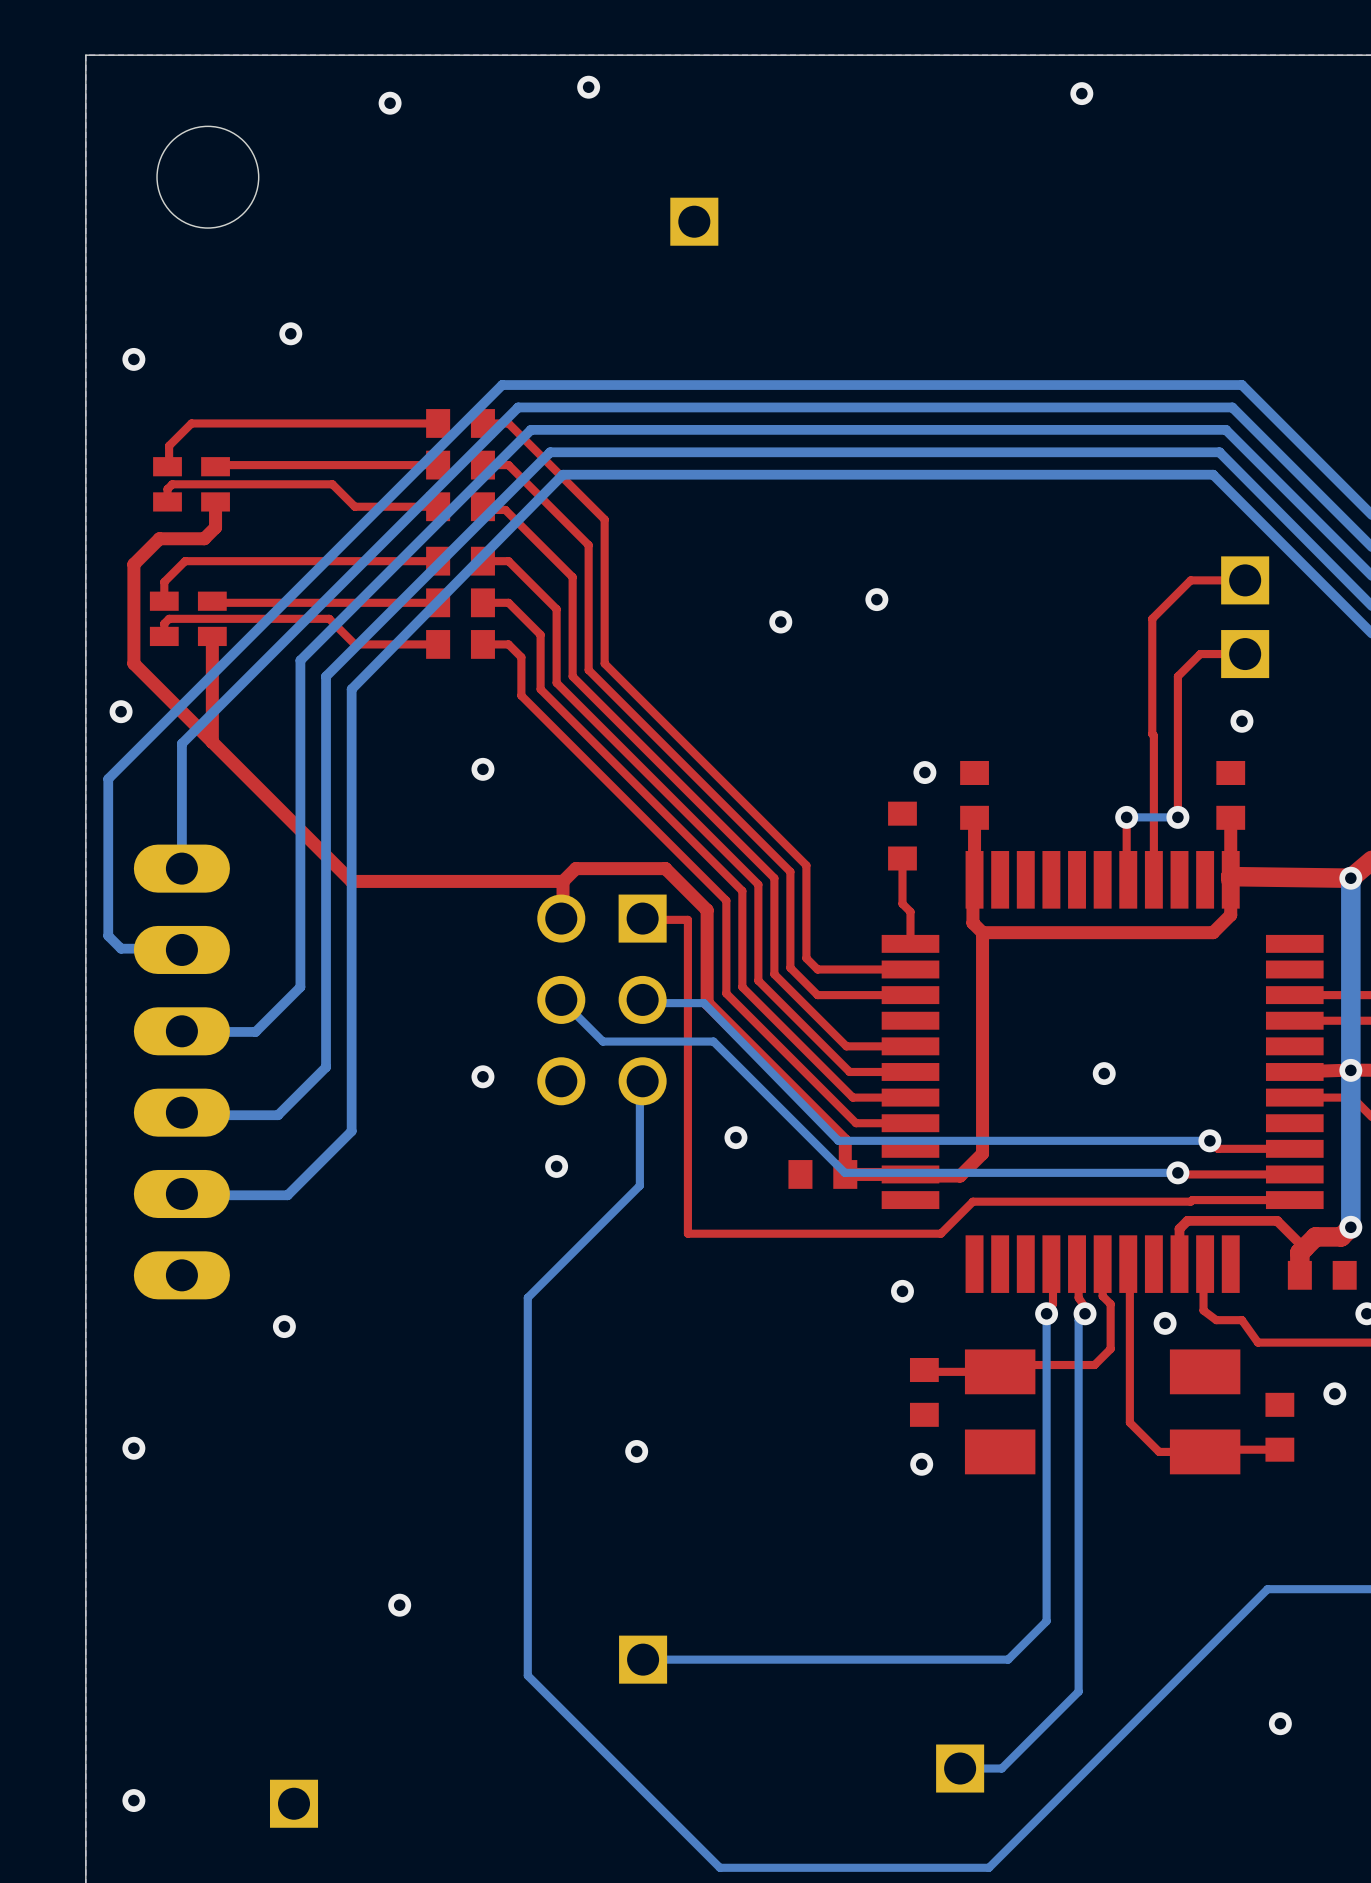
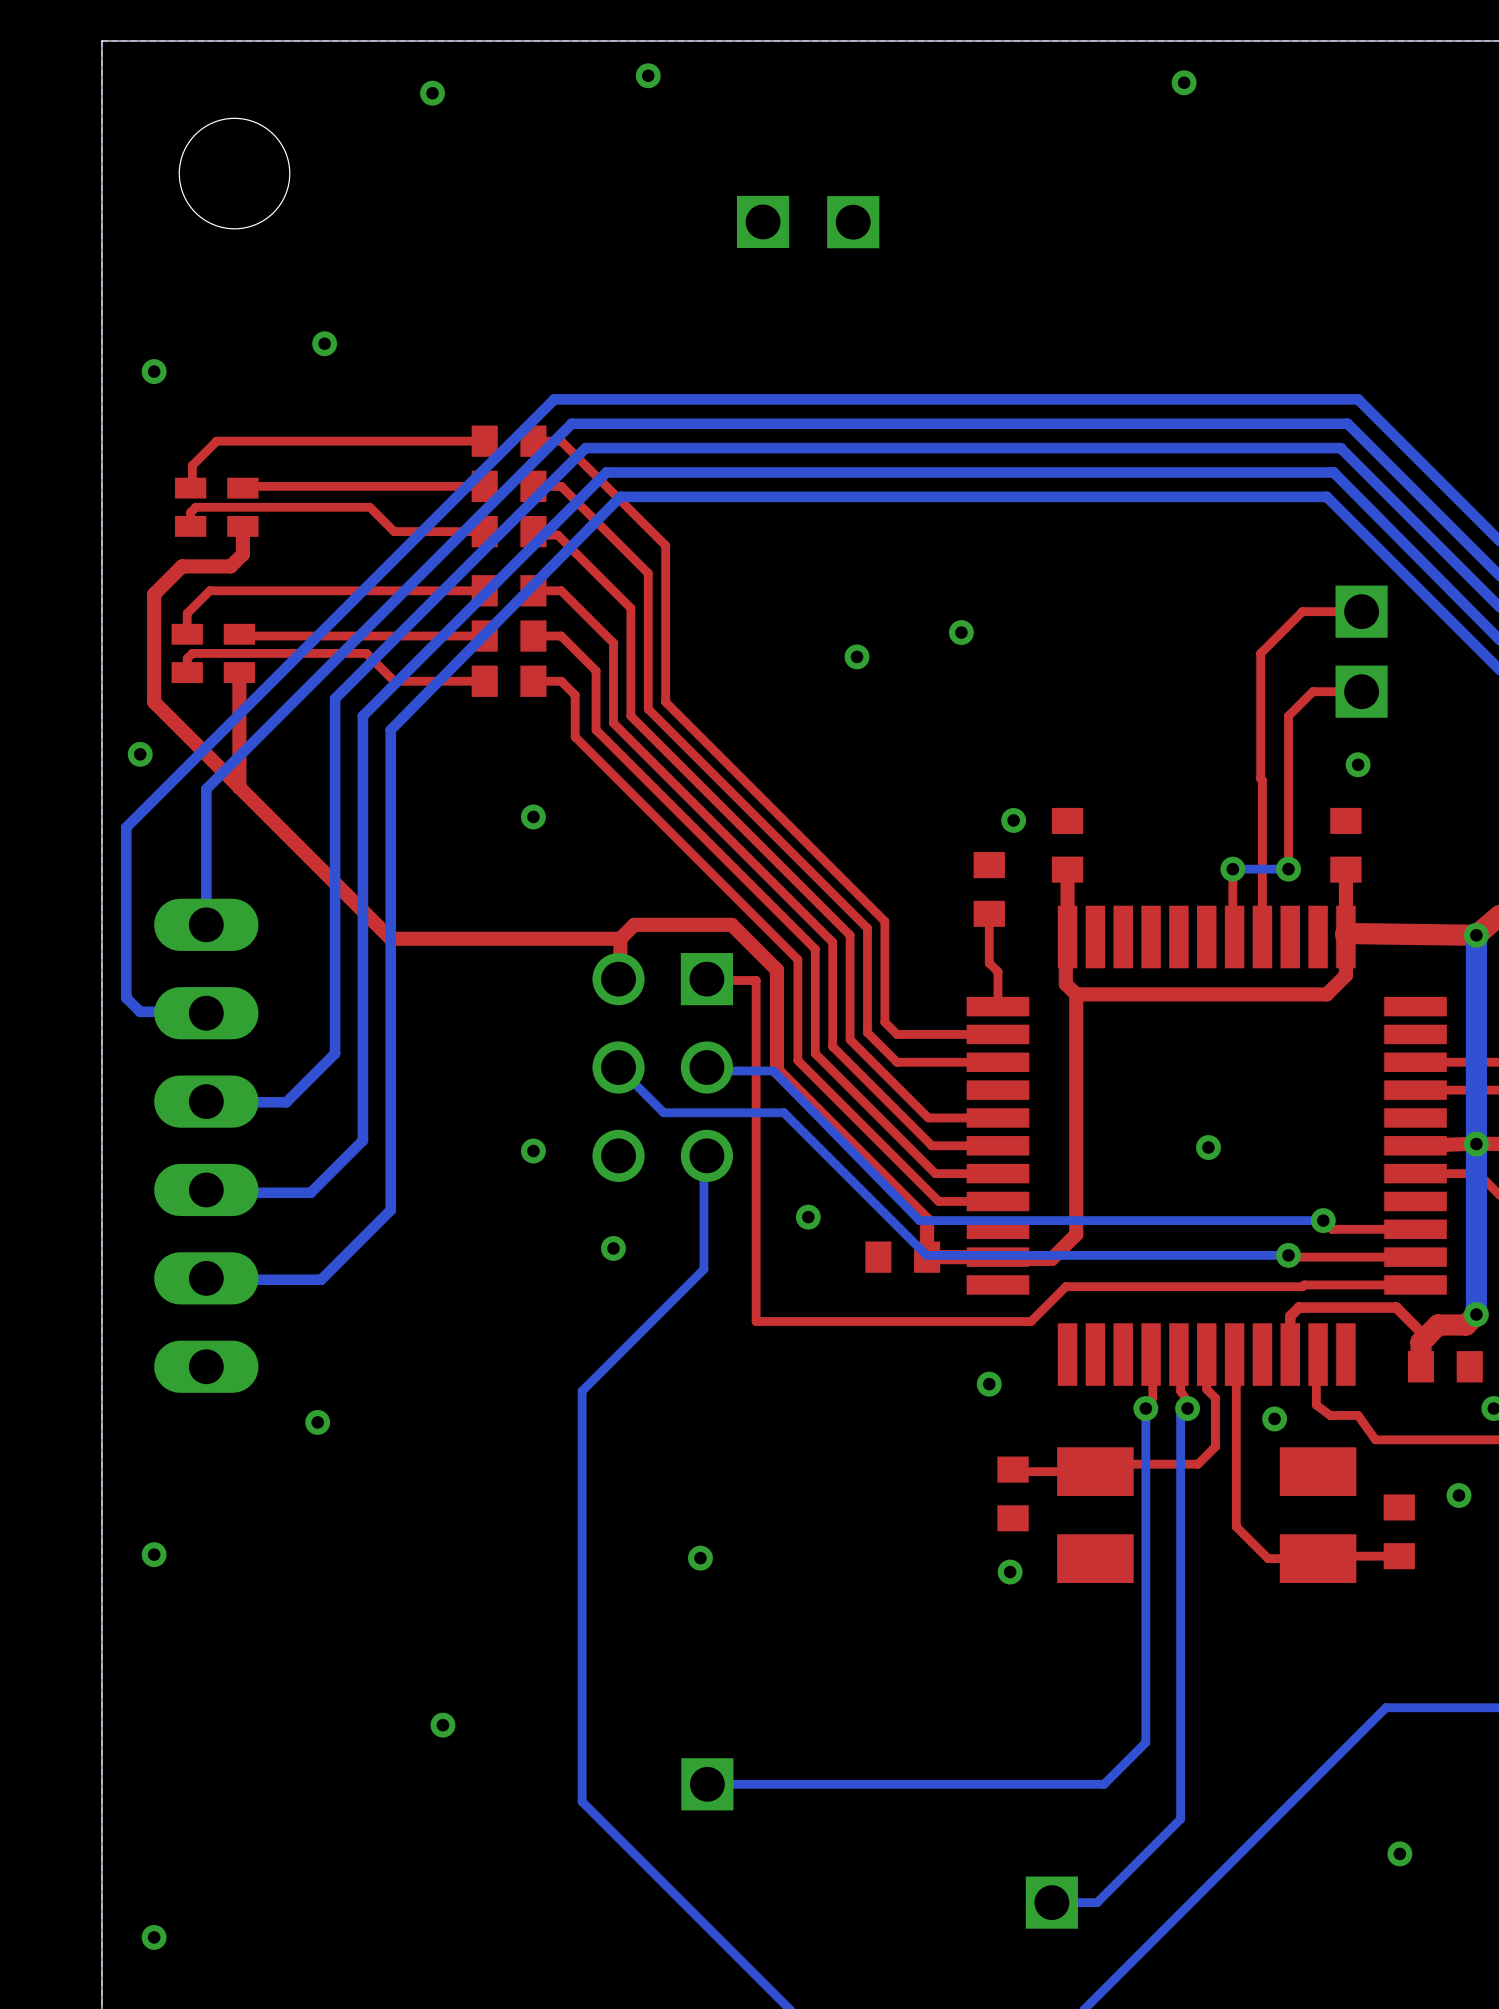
part: none -> (853, 222)
part: (294, 1803) -> none

